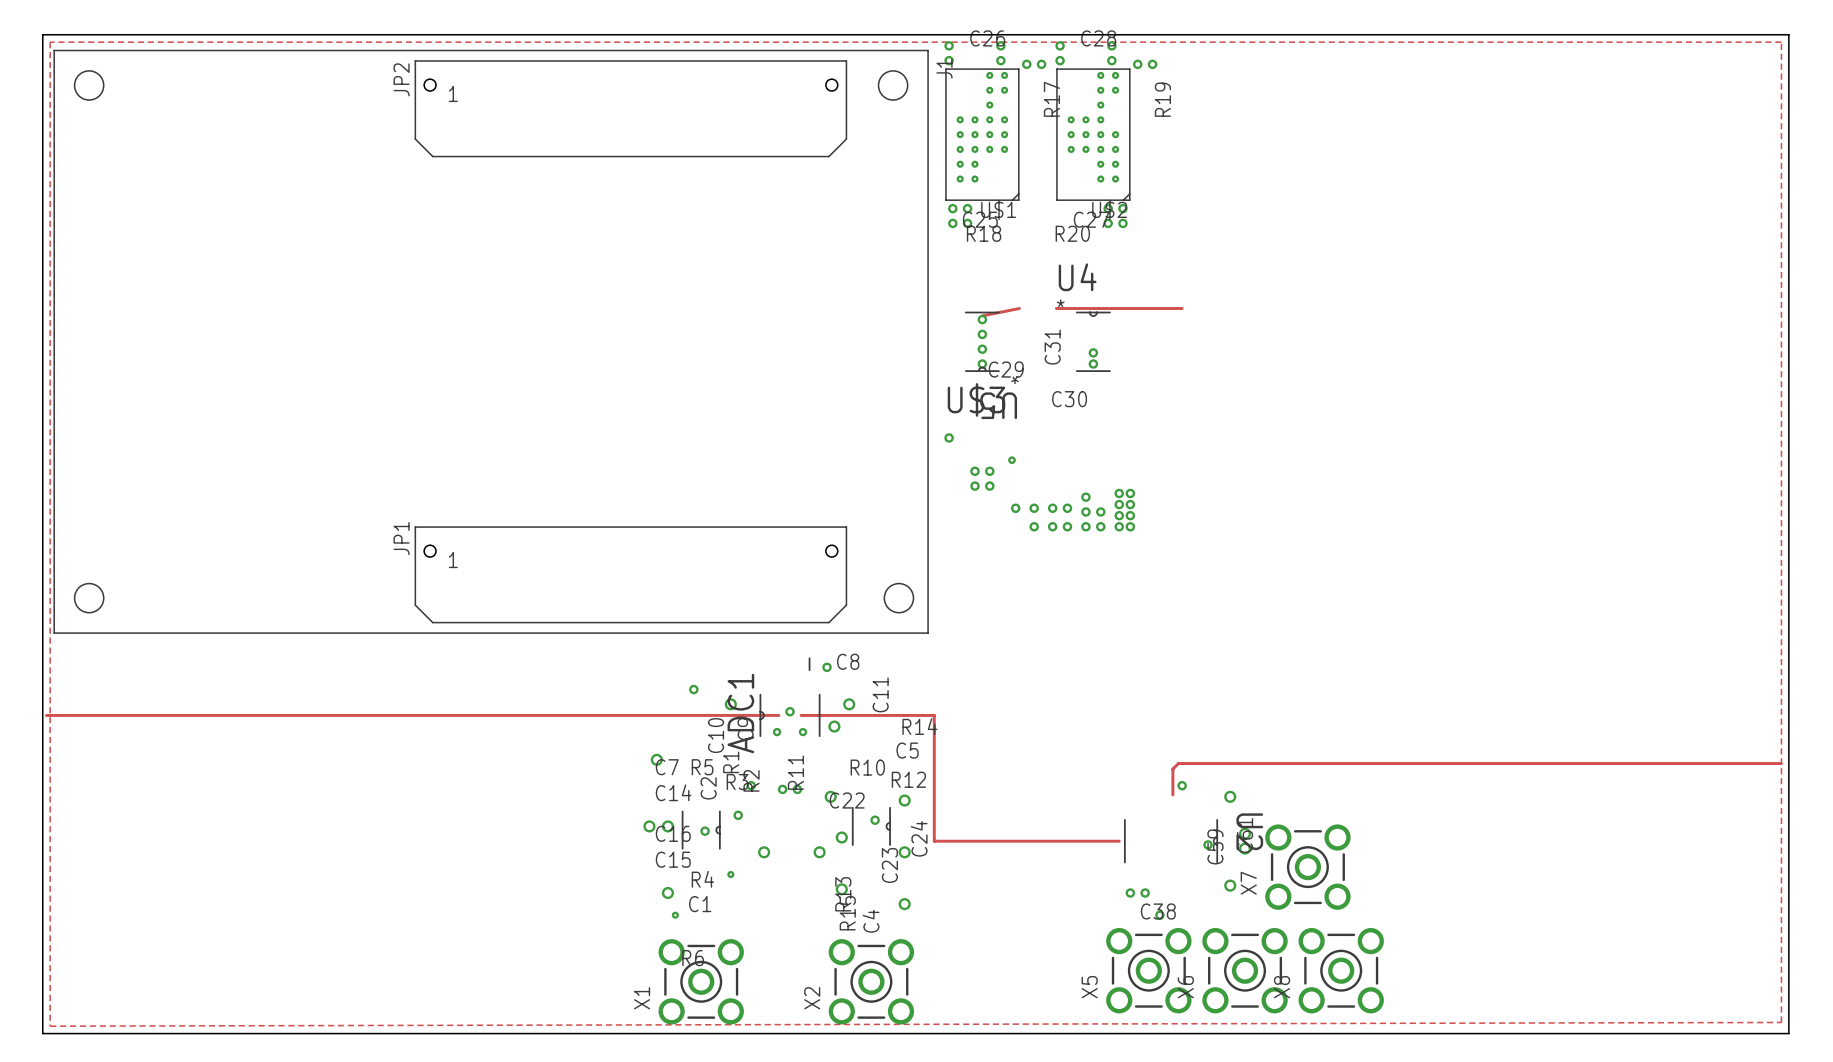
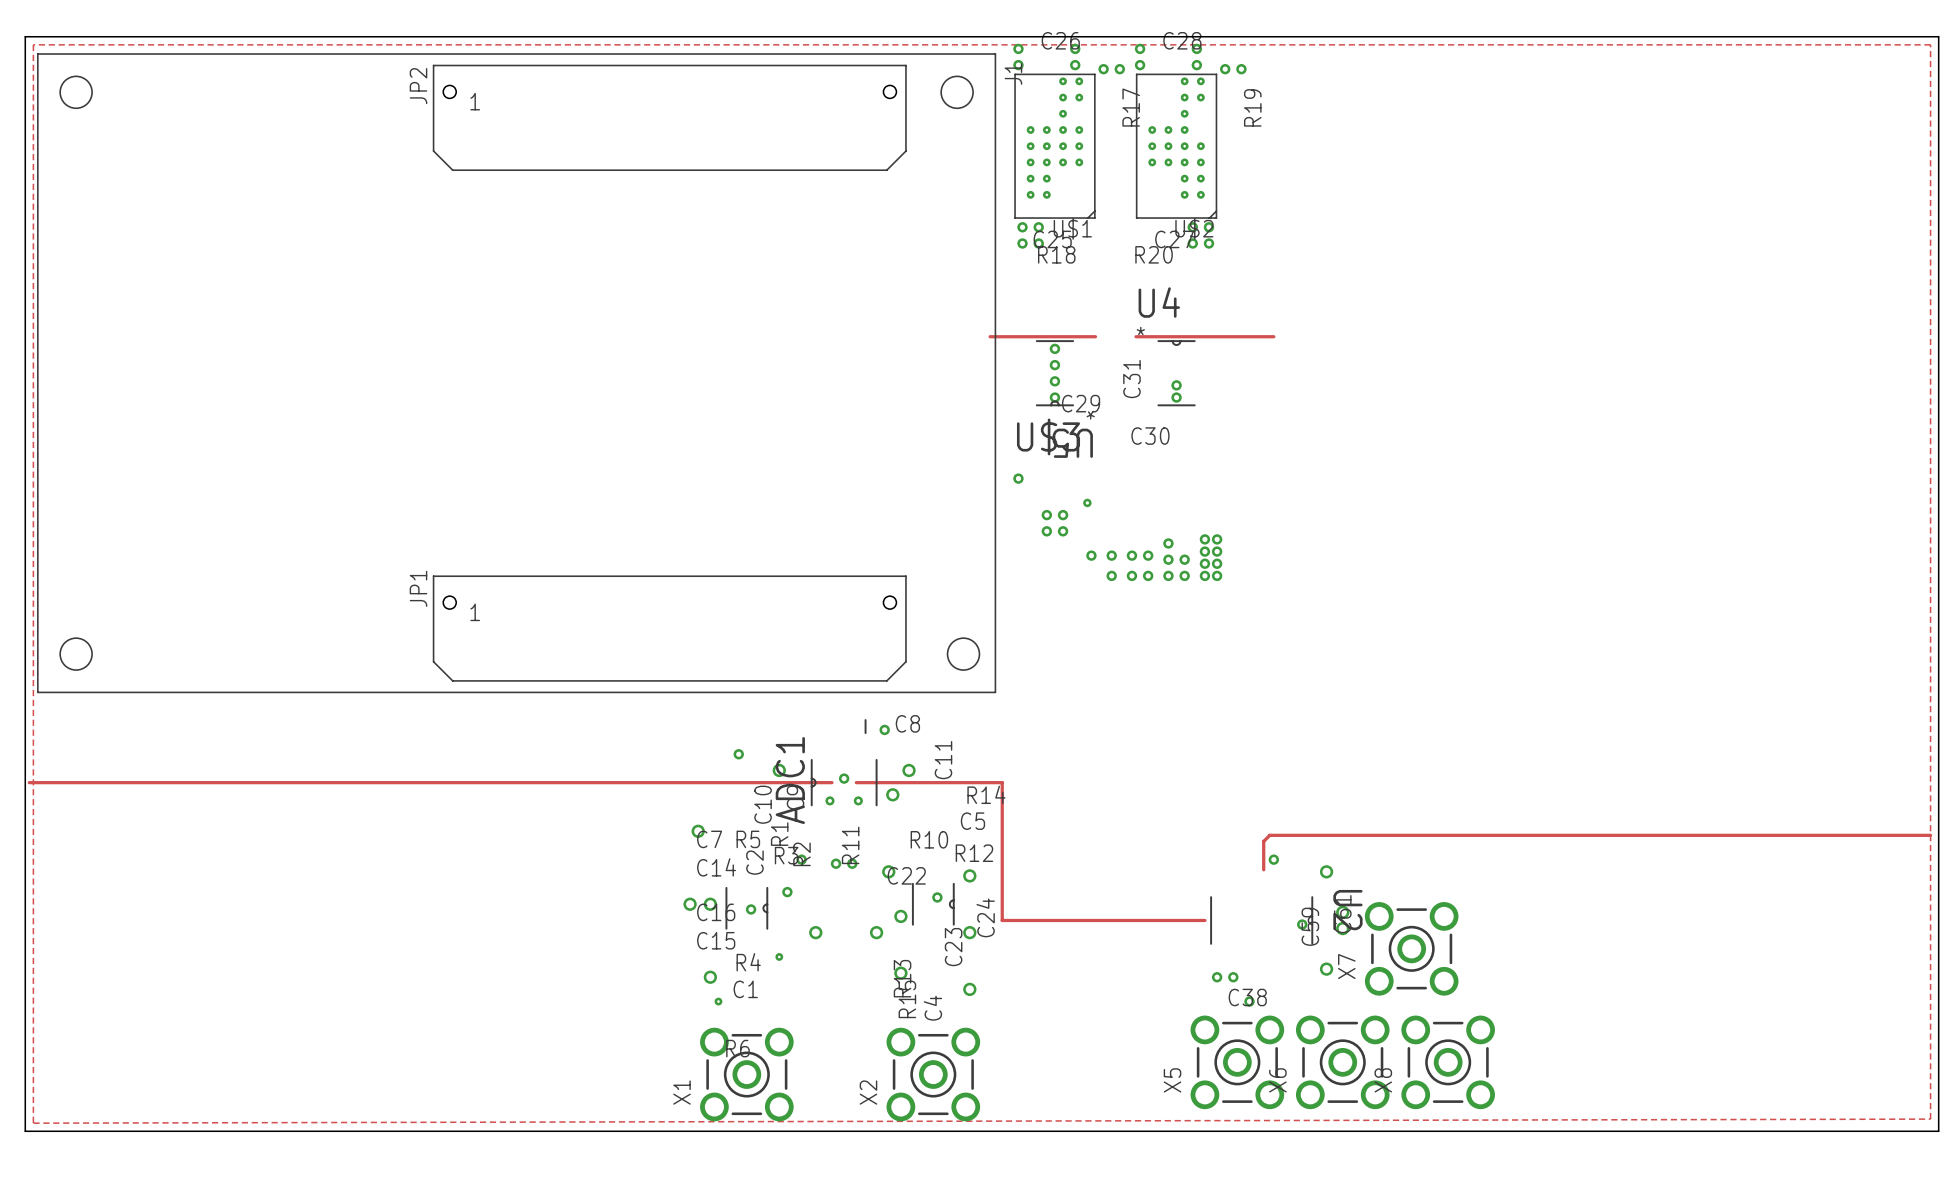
track: (1019, 308) (982, 315) -> (1095, 336) (990, 336)

